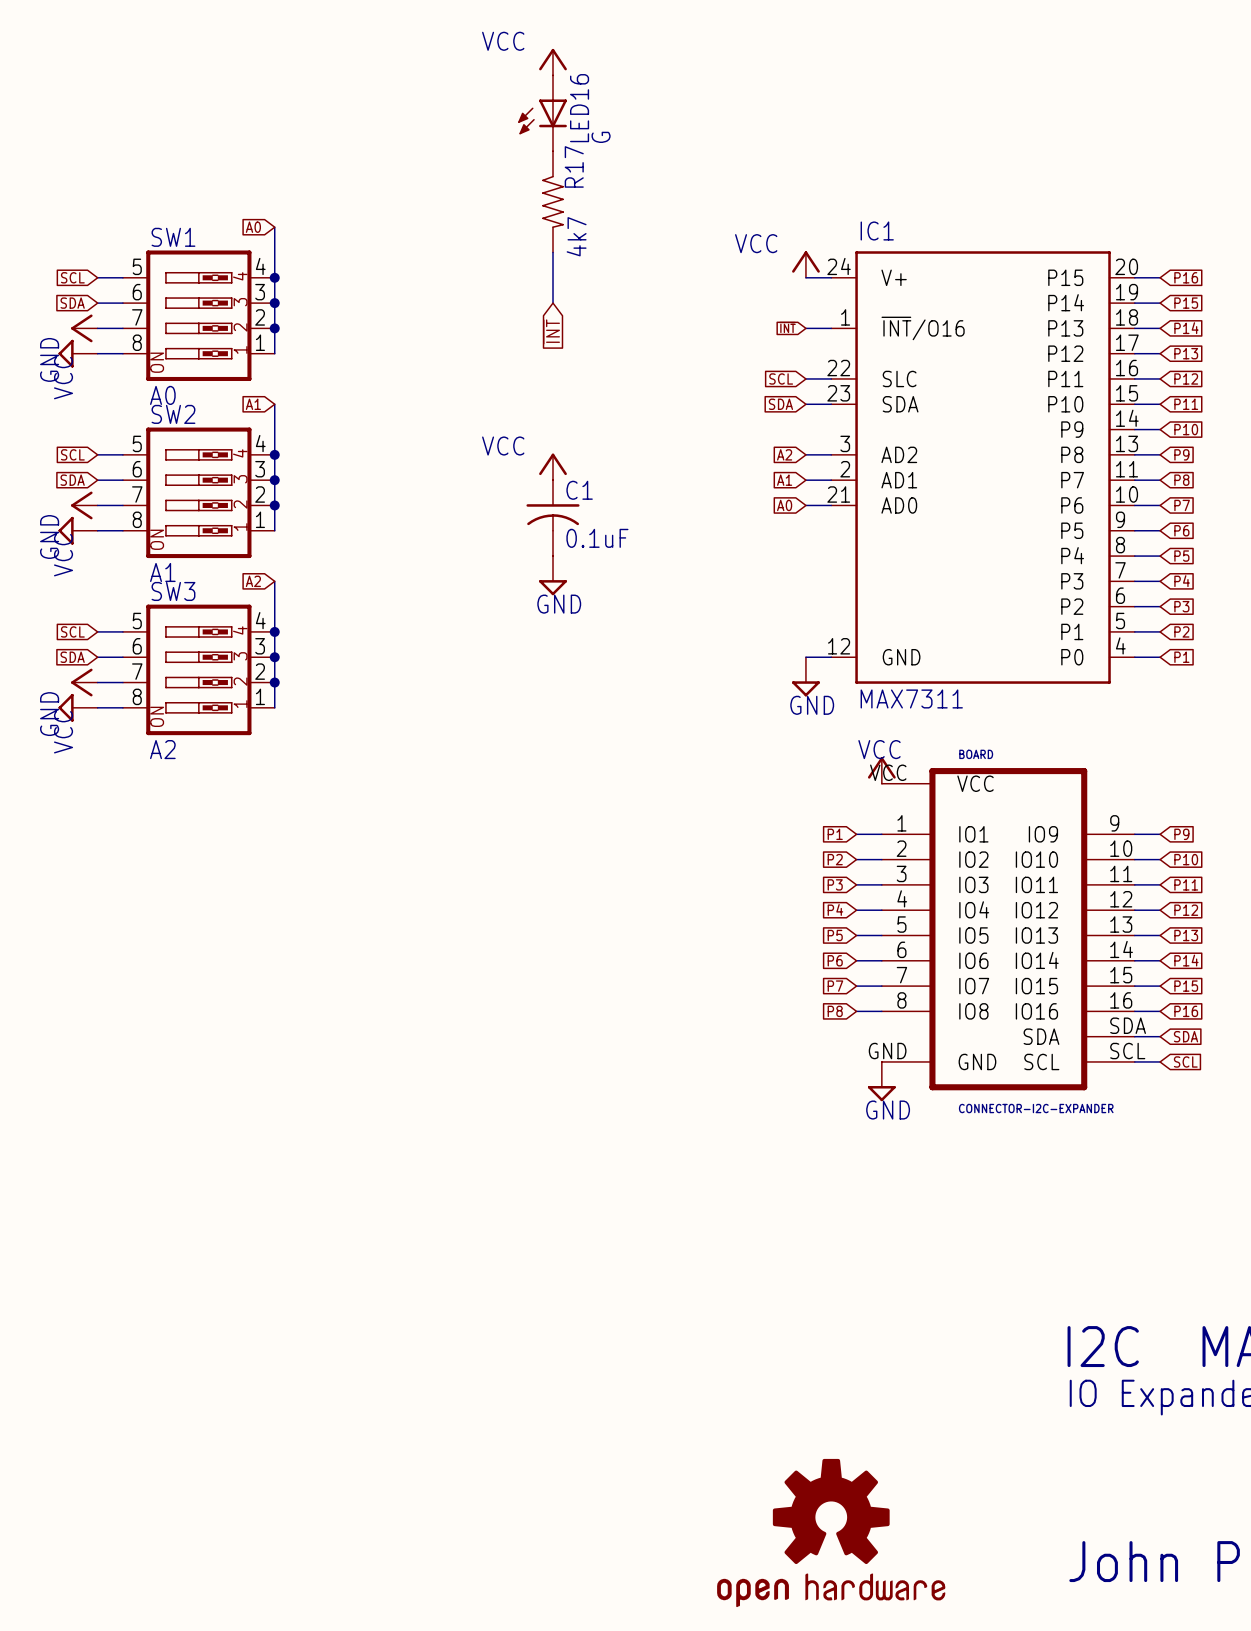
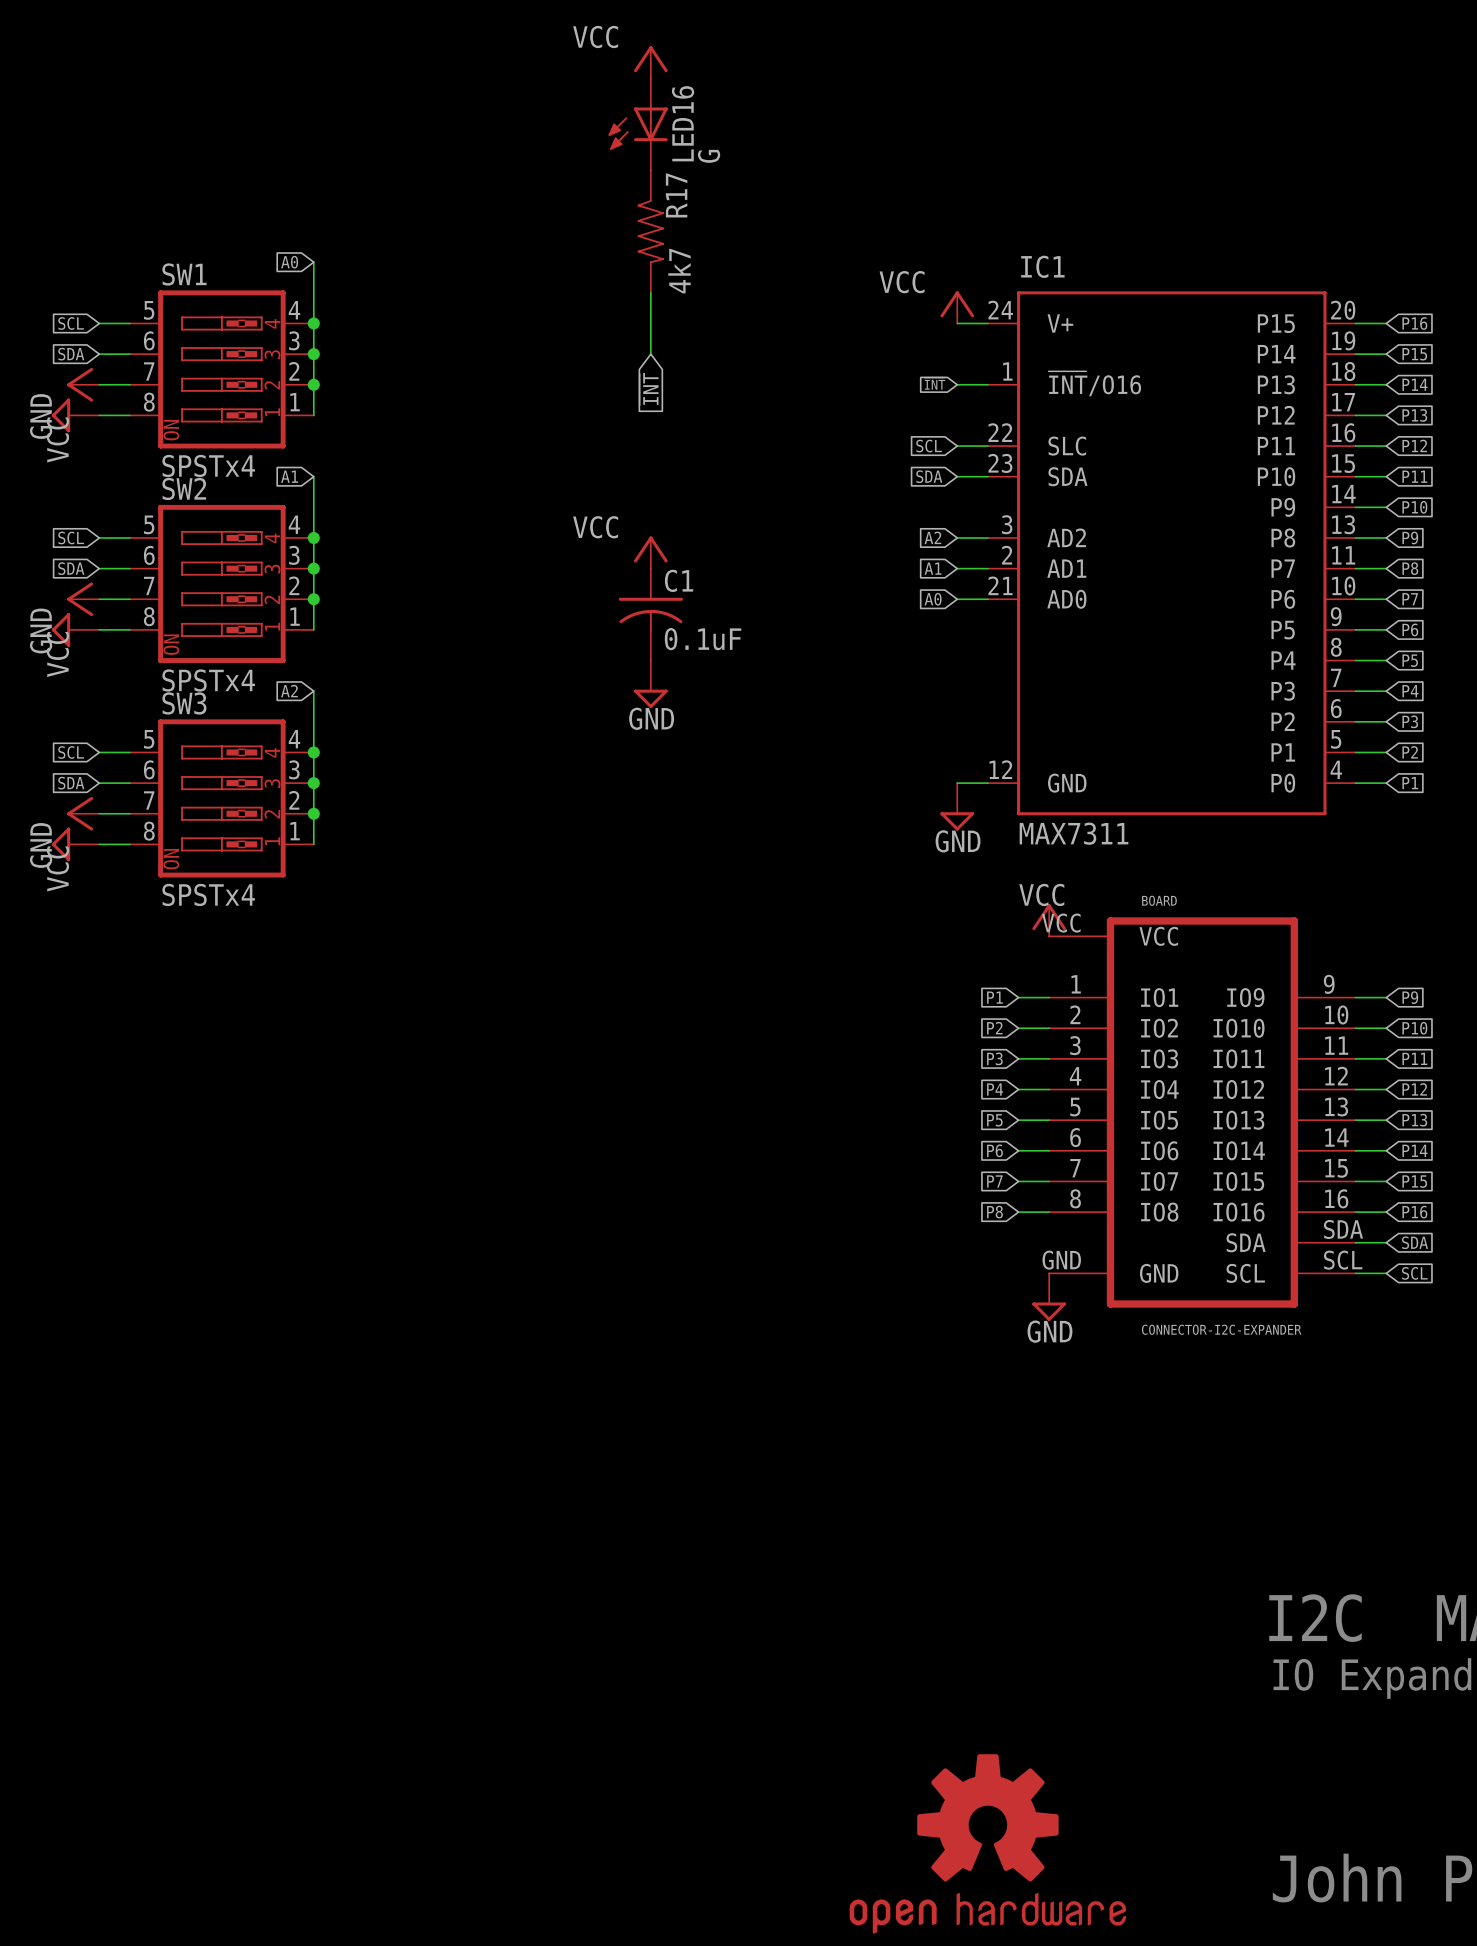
SW1 value: A0 (162, 395) -> SPSTx4 (208, 465)
SW2 value: A1 (162, 572) -> SPSTx4 (208, 680)
SW3 value: A2 (162, 749) -> SPSTx4 (208, 894)

